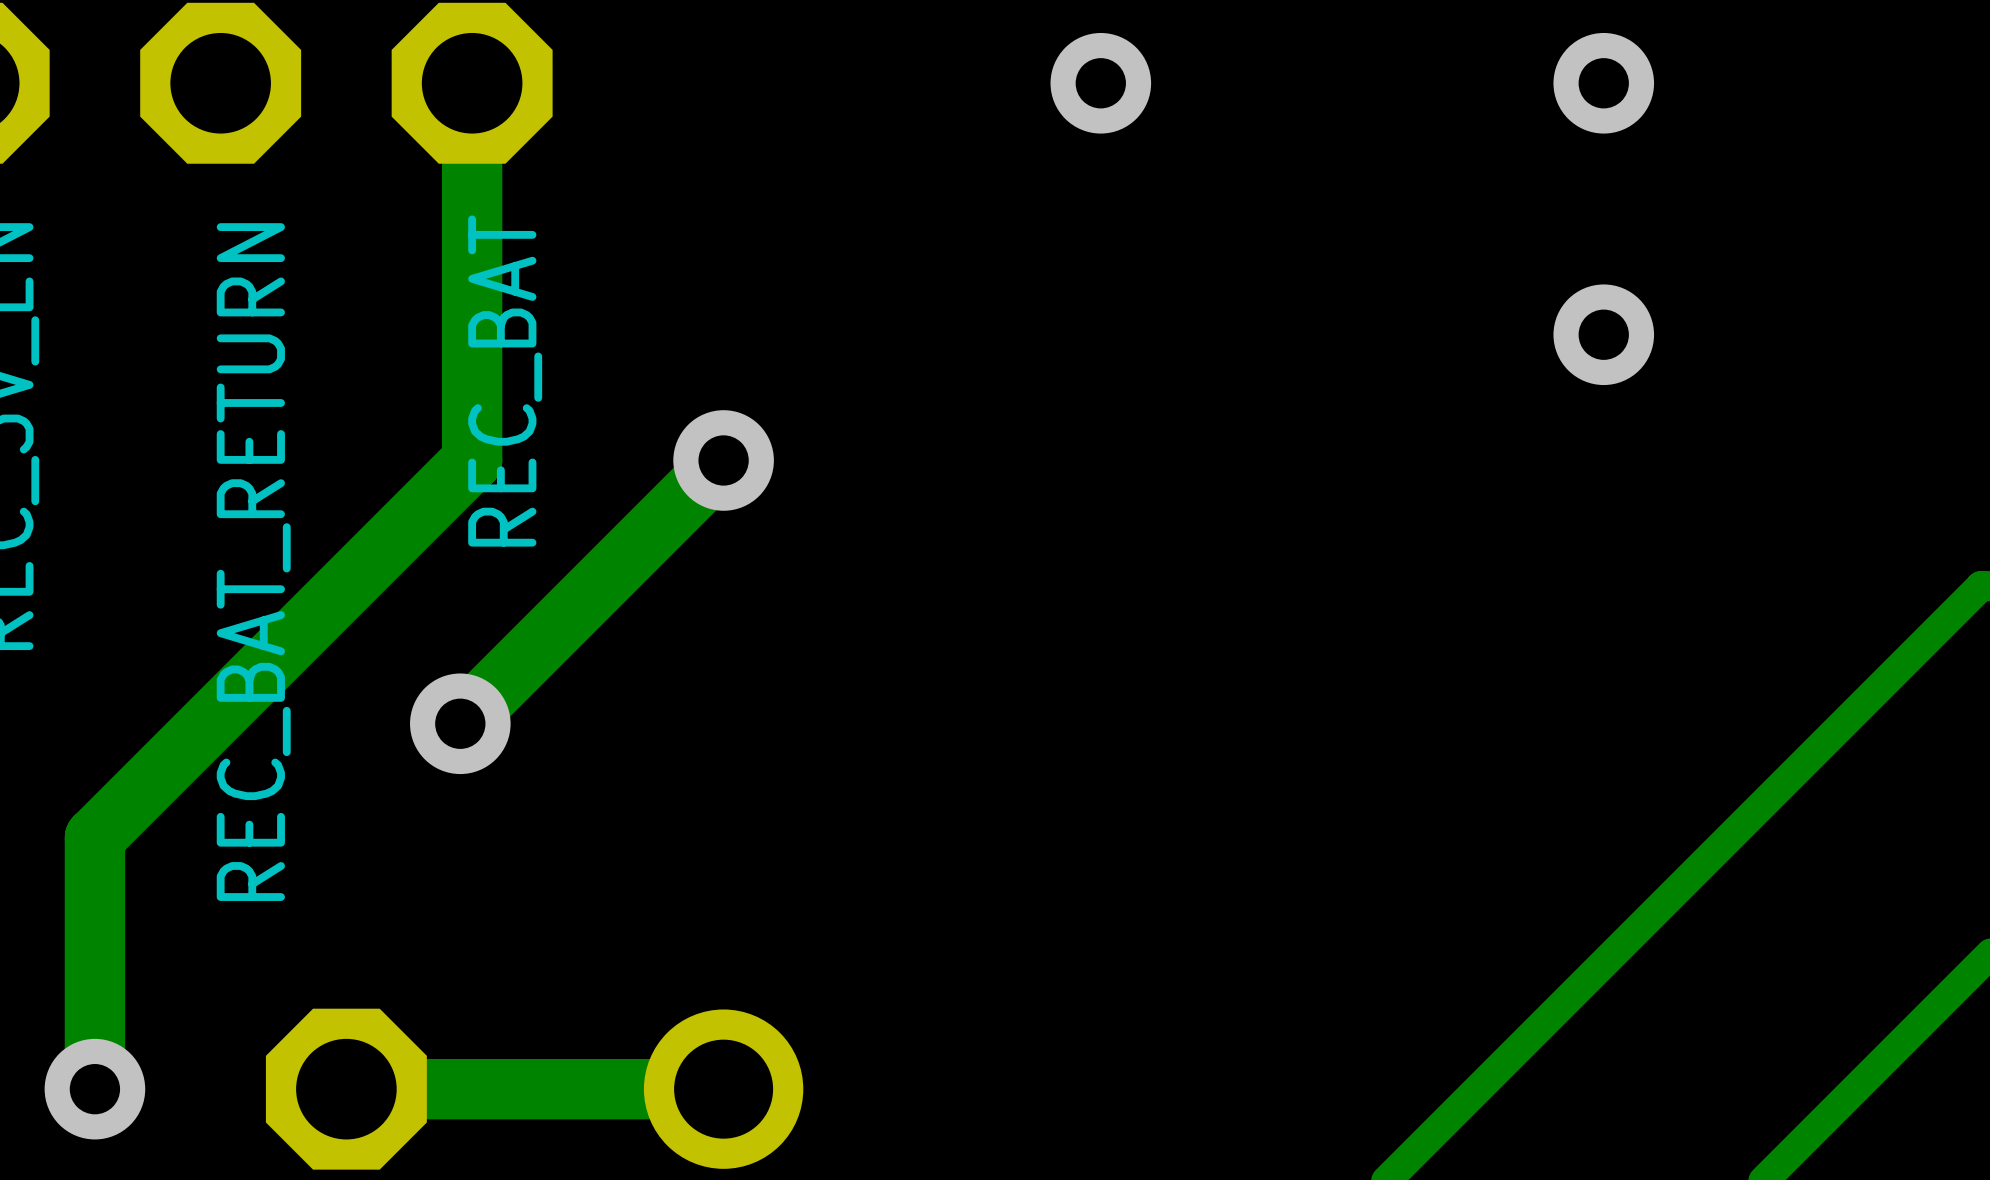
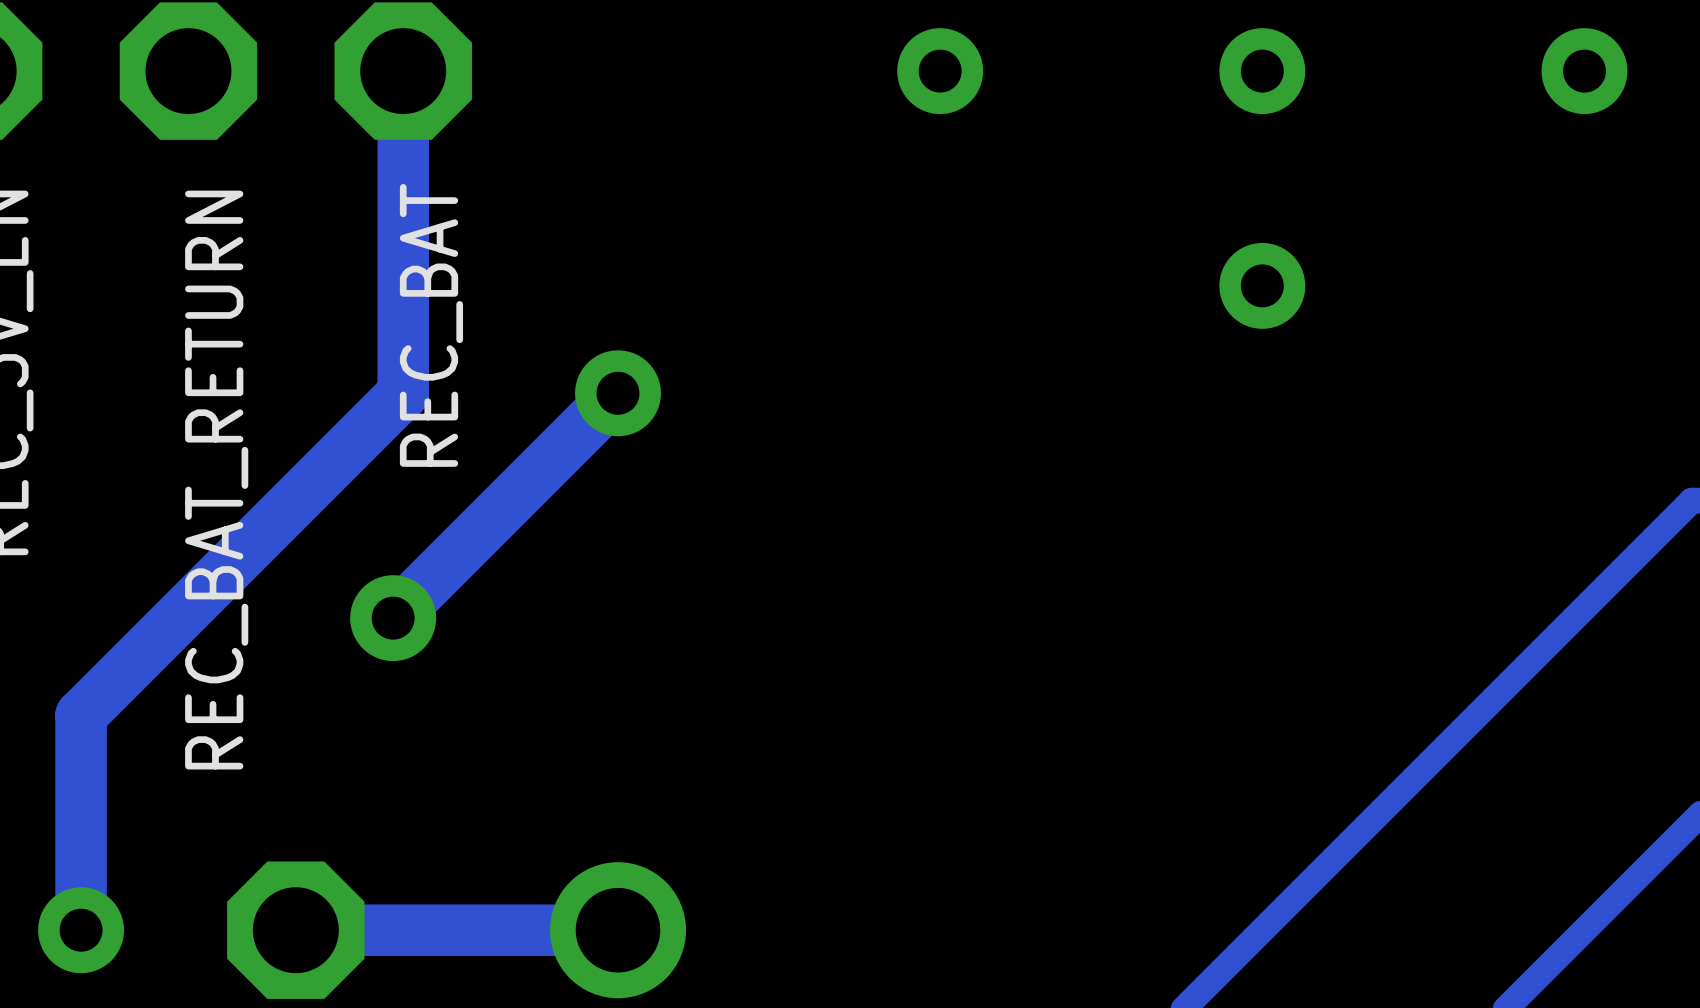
via: none -> (1262, 71)
via: (1603, 83) -> none
via: none -> (1584, 71)
via position: (1603, 334) -> (1262, 285)

